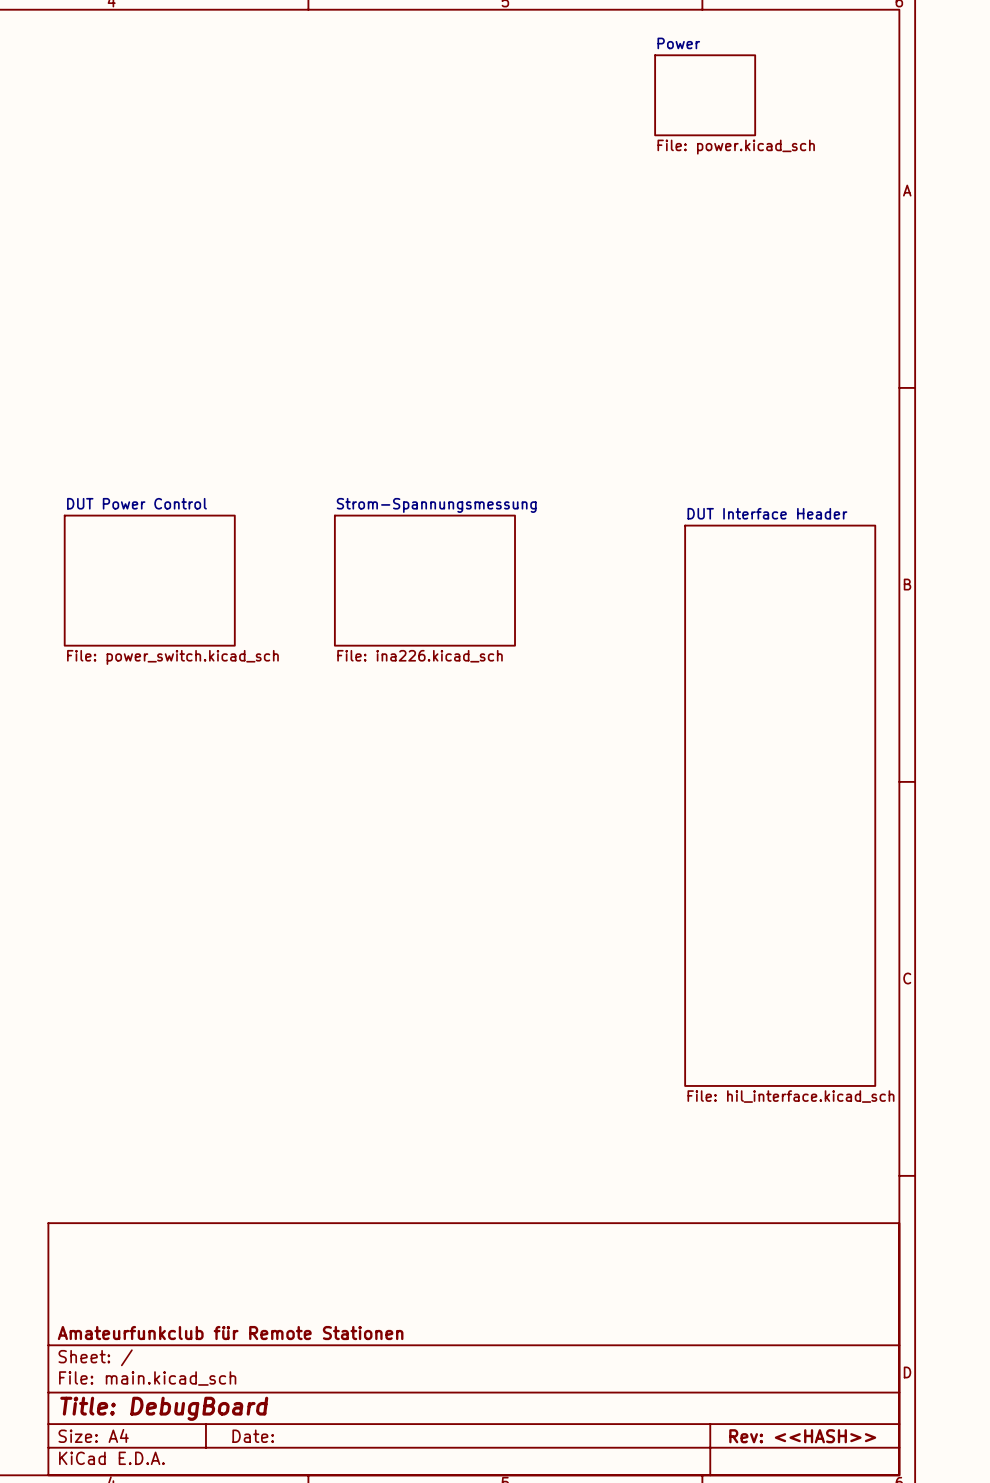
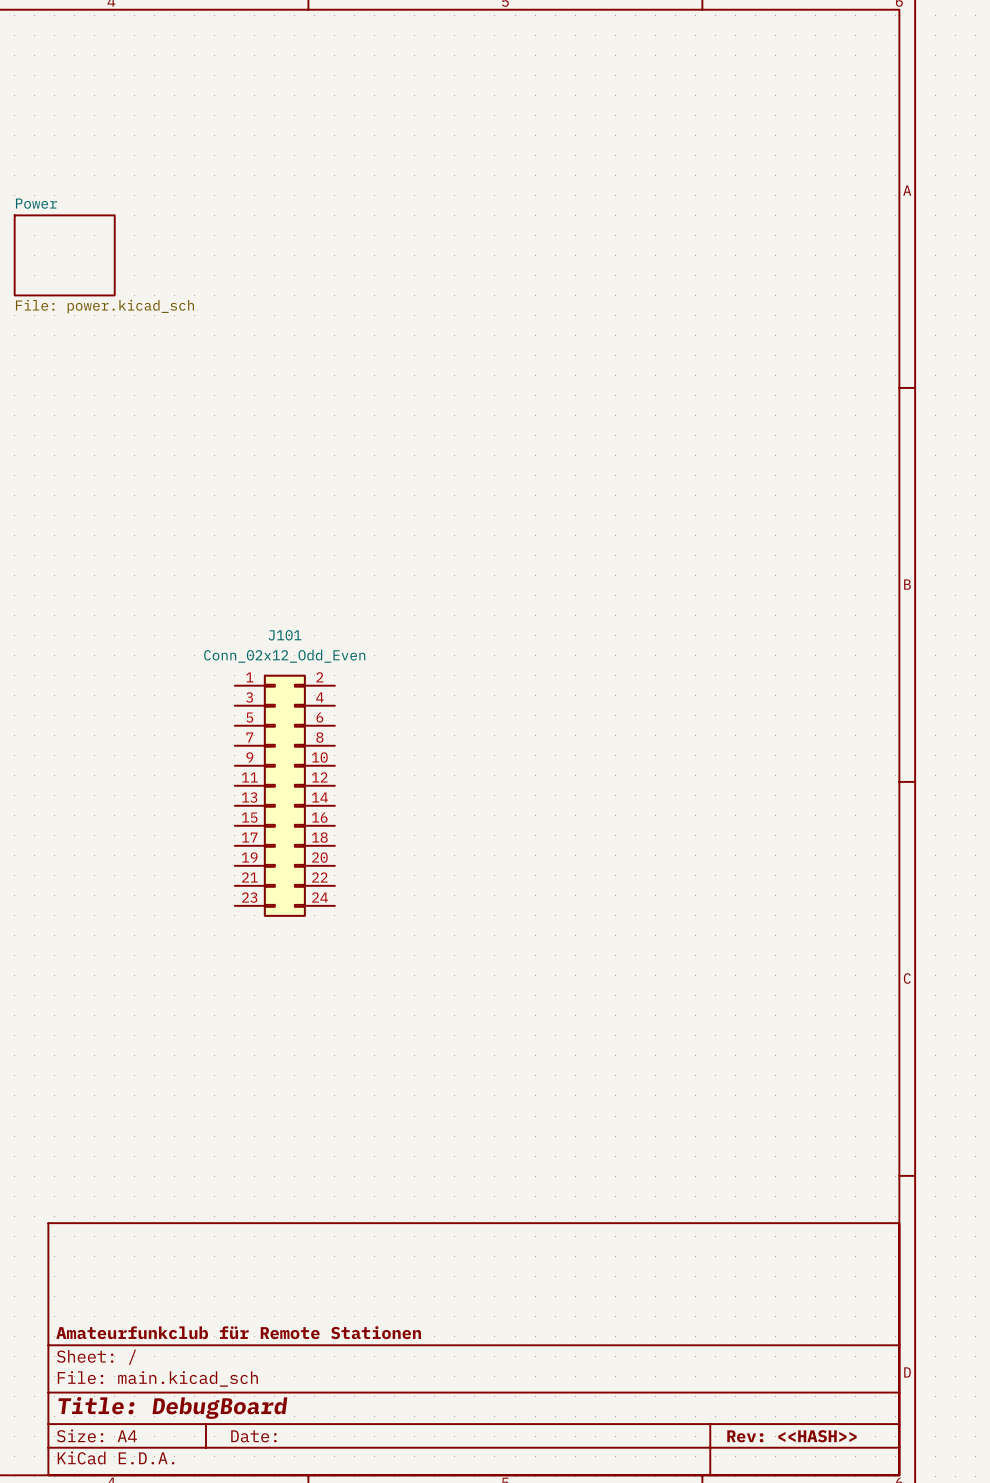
sheet Power: File: power.kicad_sch (705, 95) -> none
sheet Power: none -> File: power.kicad_sch (64, 255)
sheet DUT Power Control: File: power_switch.kicad_sch (149, 580) -> none
sheet Strom-Spannungsmessung: File: ina226.kicad_sch (424, 580) -> none
J101: none -> Conn_02x12_Odd_Even (284, 795)
sheet DUT Interface Header: File: hil_interface.kicad_sch (780, 805) -> none

